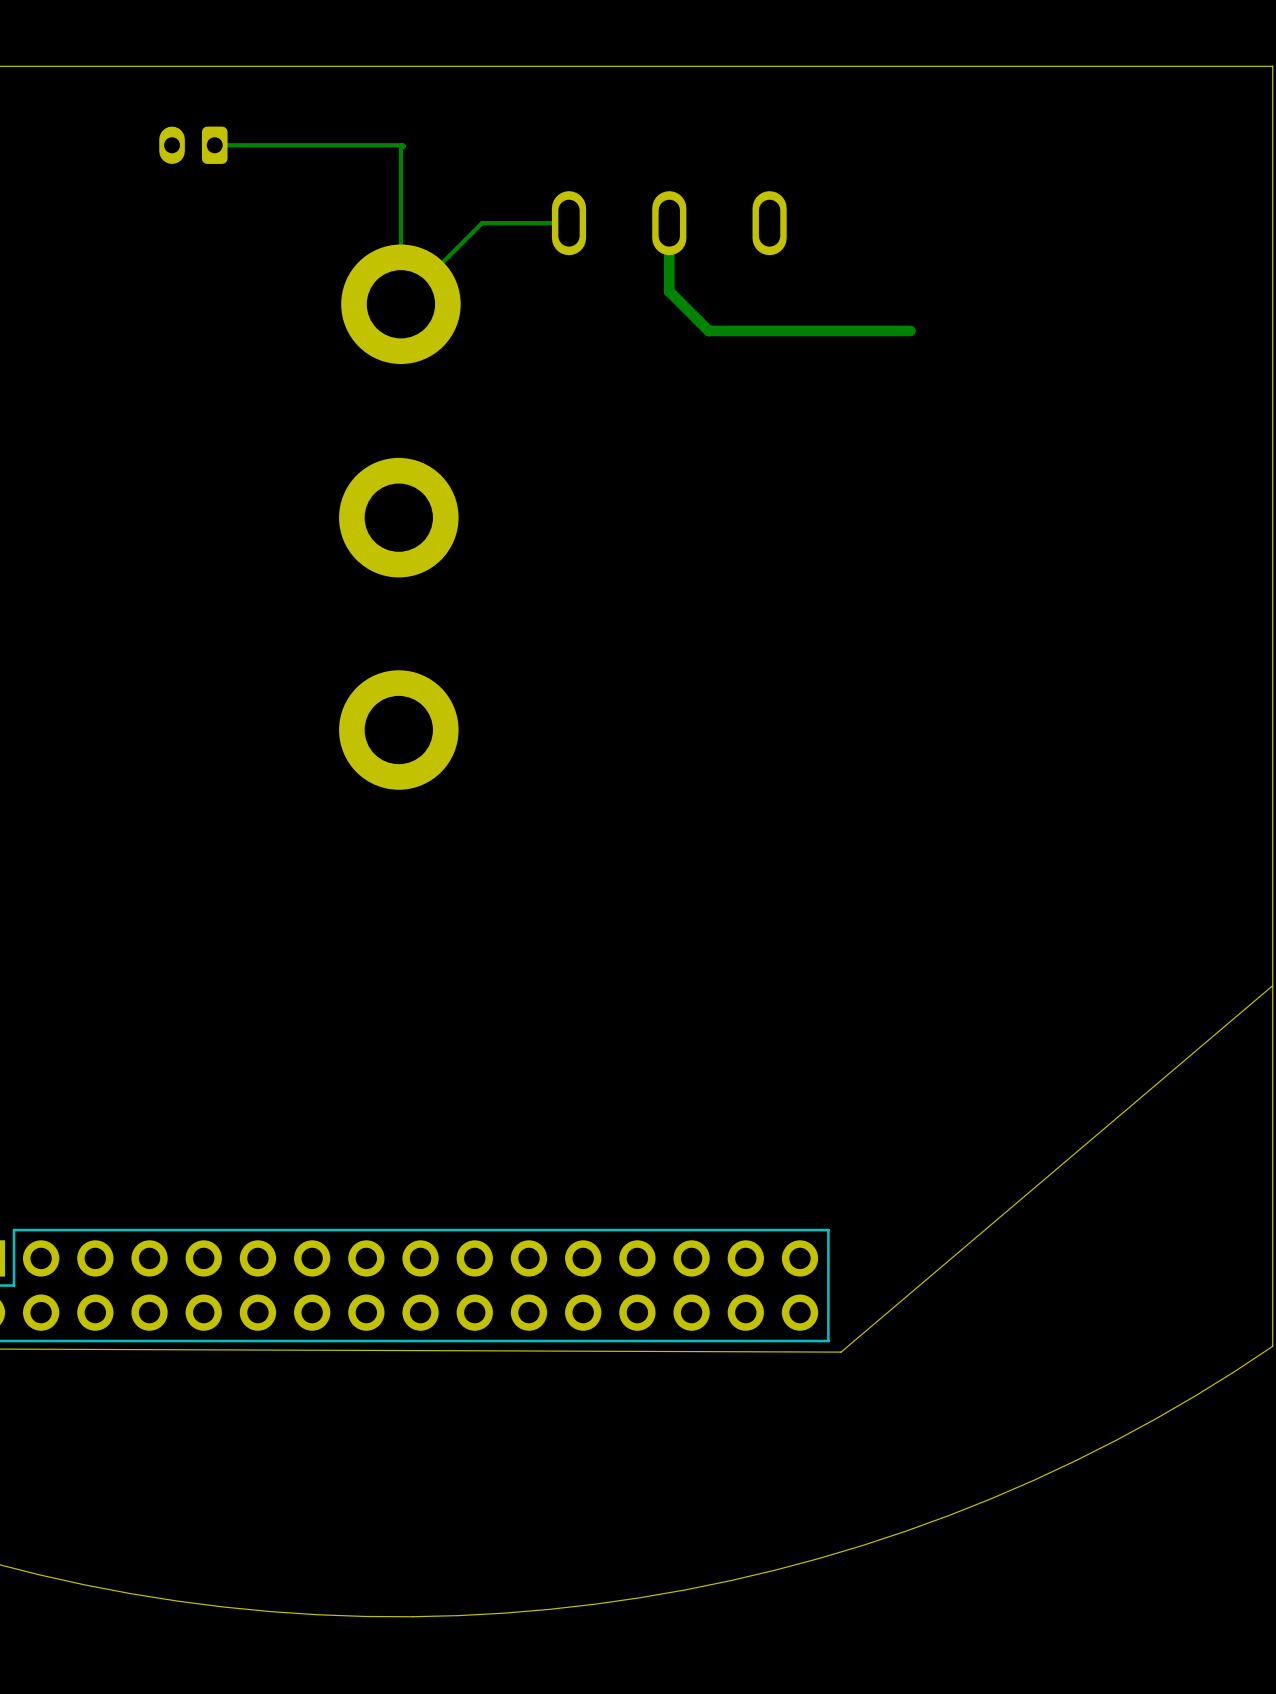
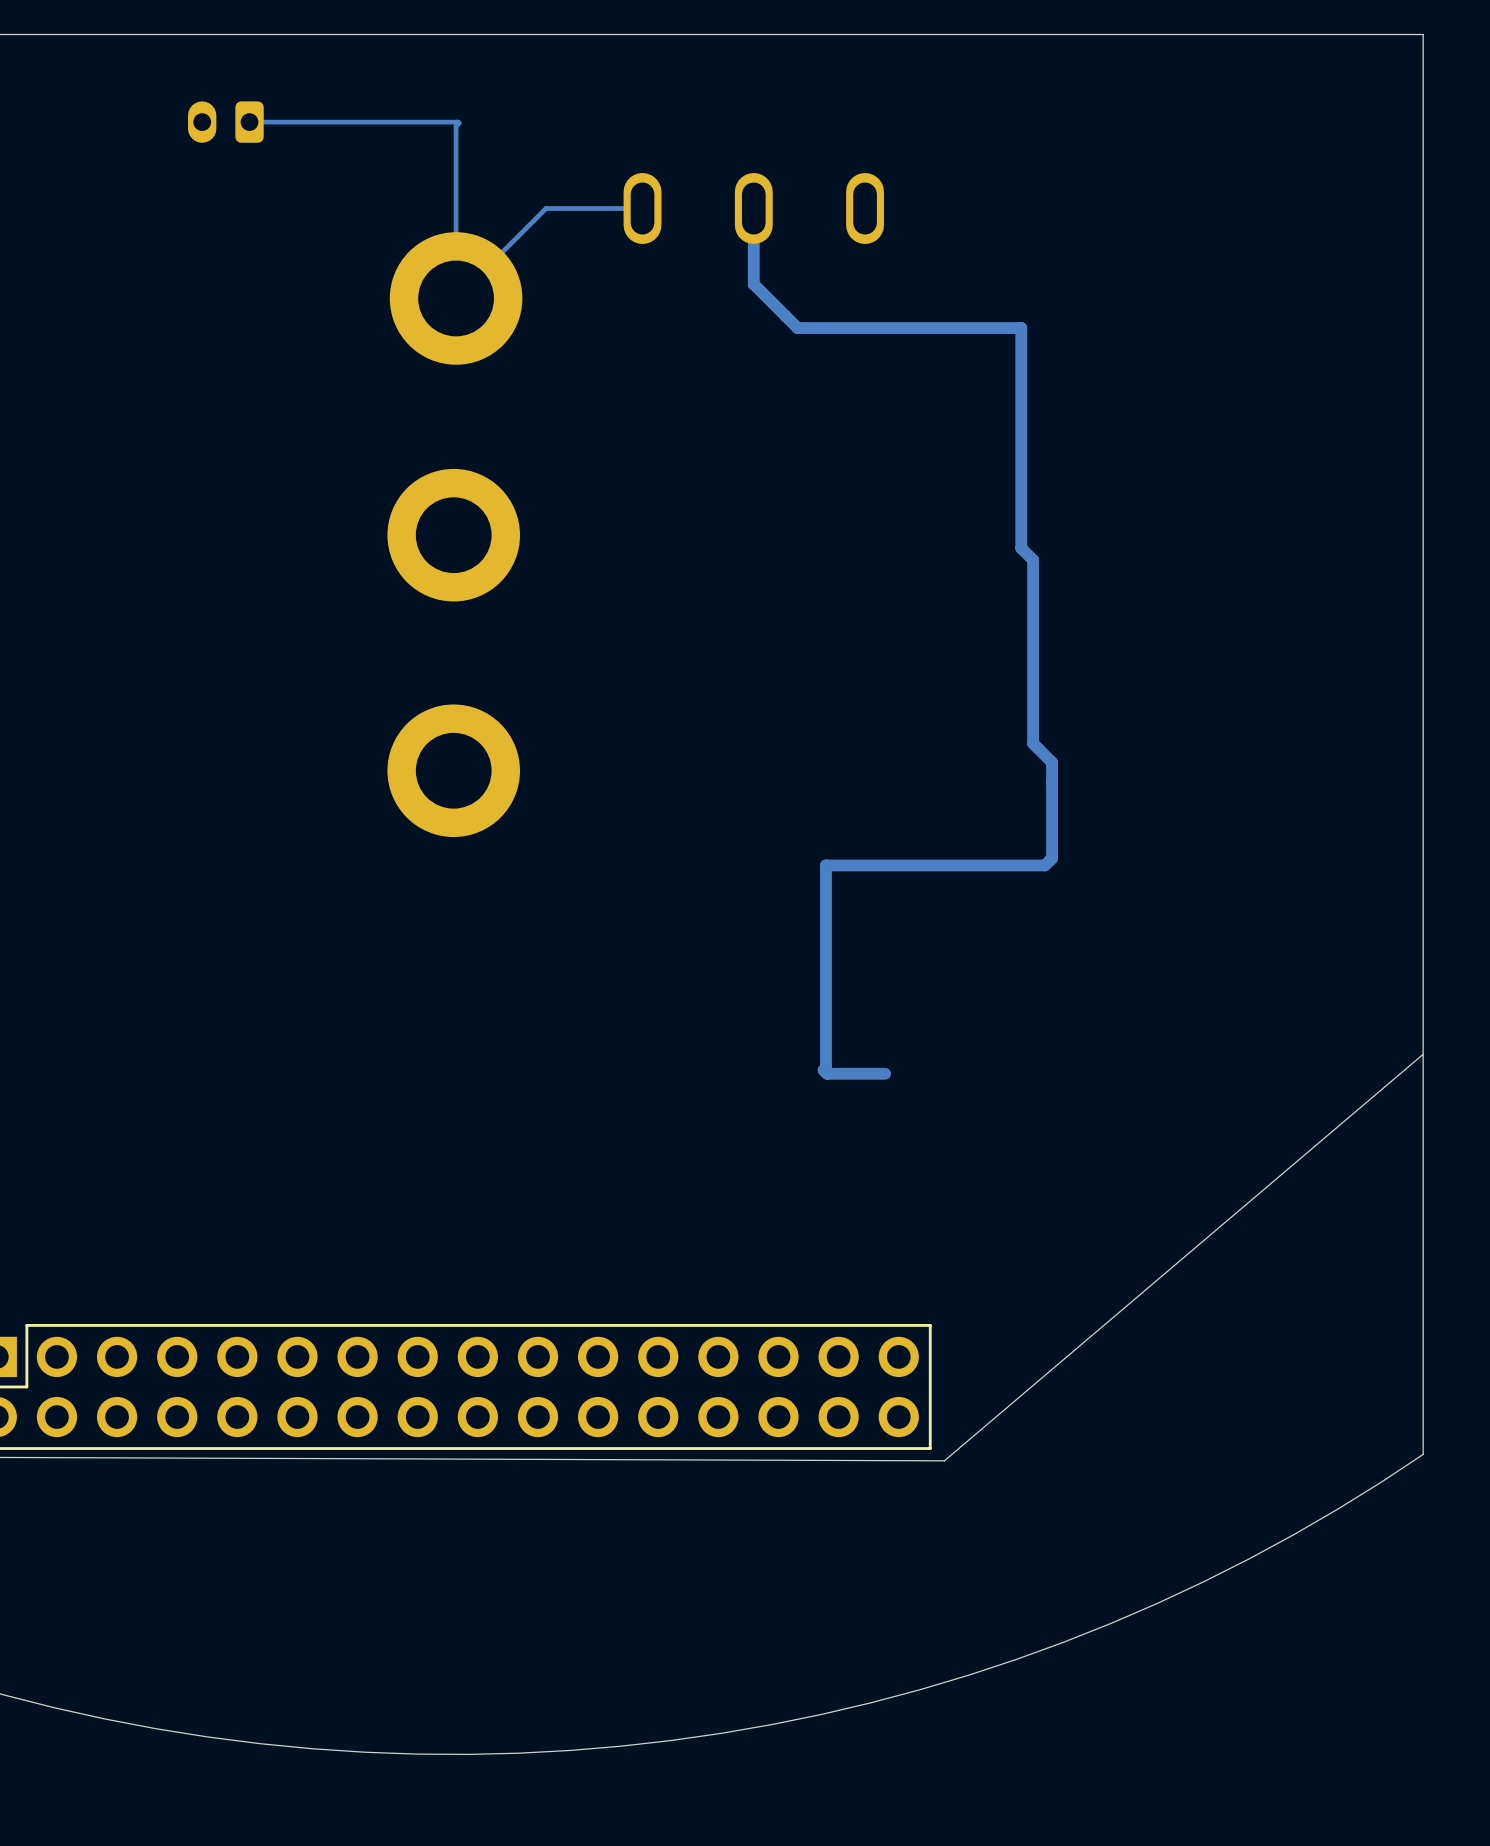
track: none -> (1021, 328) (1021, 548) (1033, 560) (1033, 743) (1052, 762) (1052, 858) (1044, 865) (825, 865) (825, 1067) (823, 1070) (827, 1073) (885, 1073)

